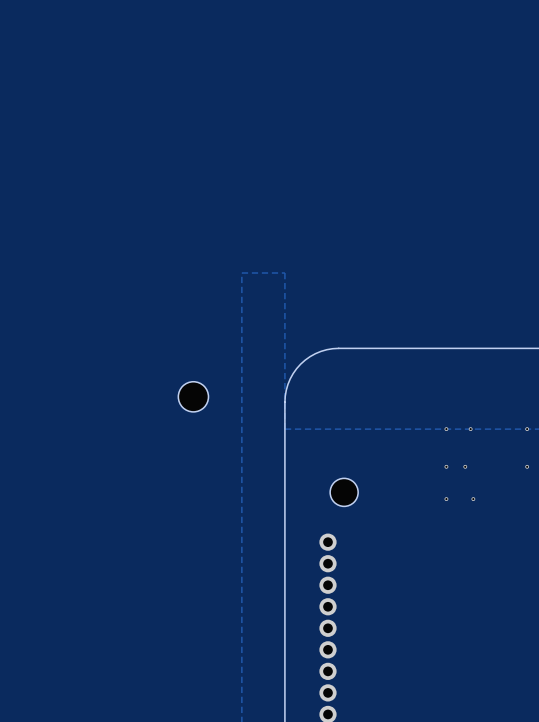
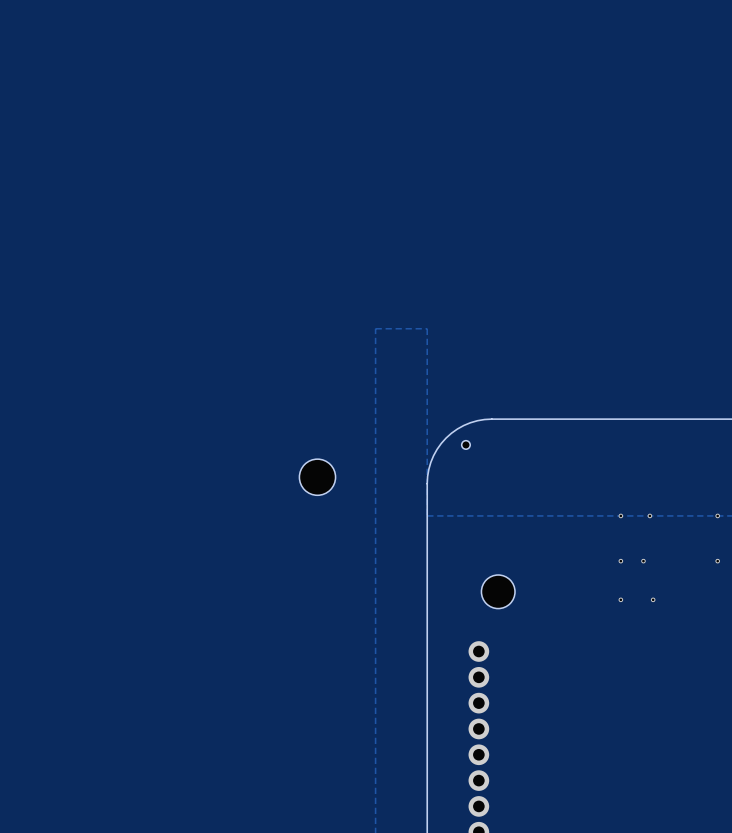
part: none -> (465, 444)

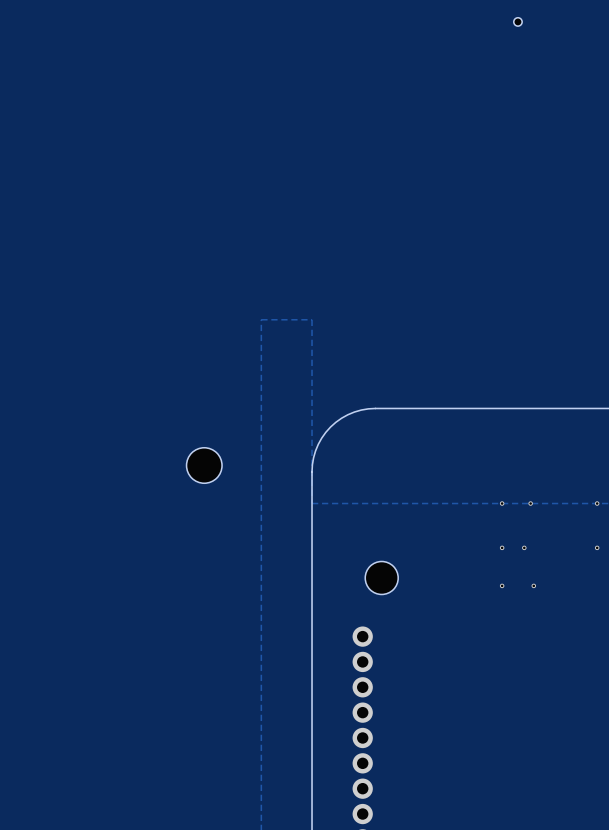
part: none -> (517, 21)
part: (465, 444) -> none

